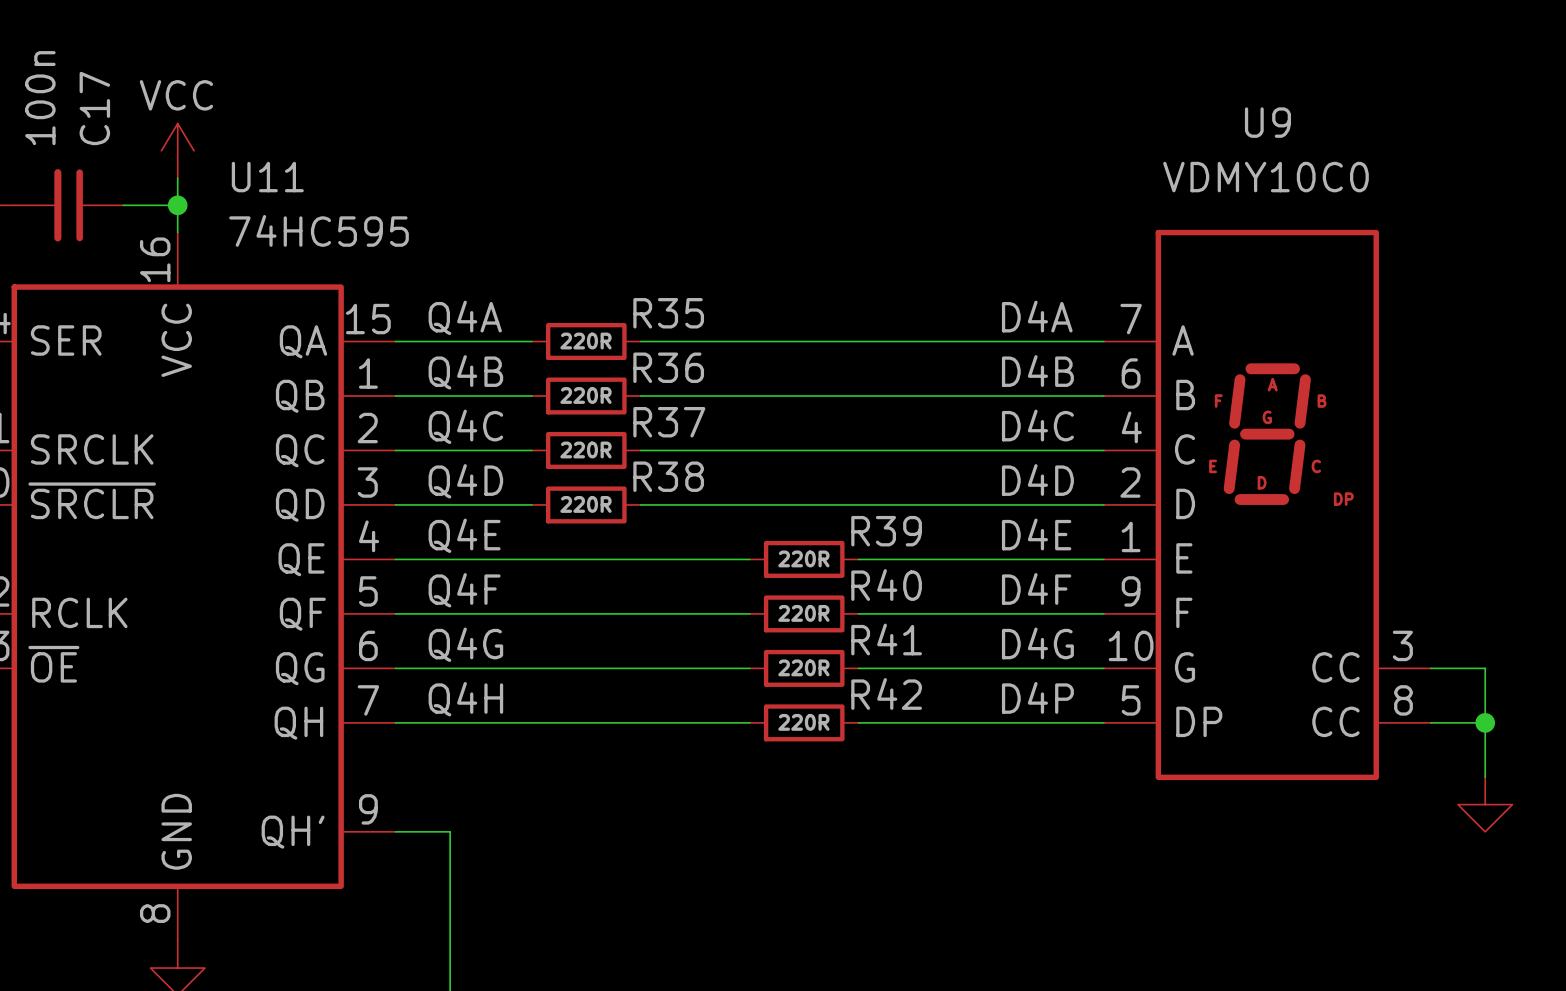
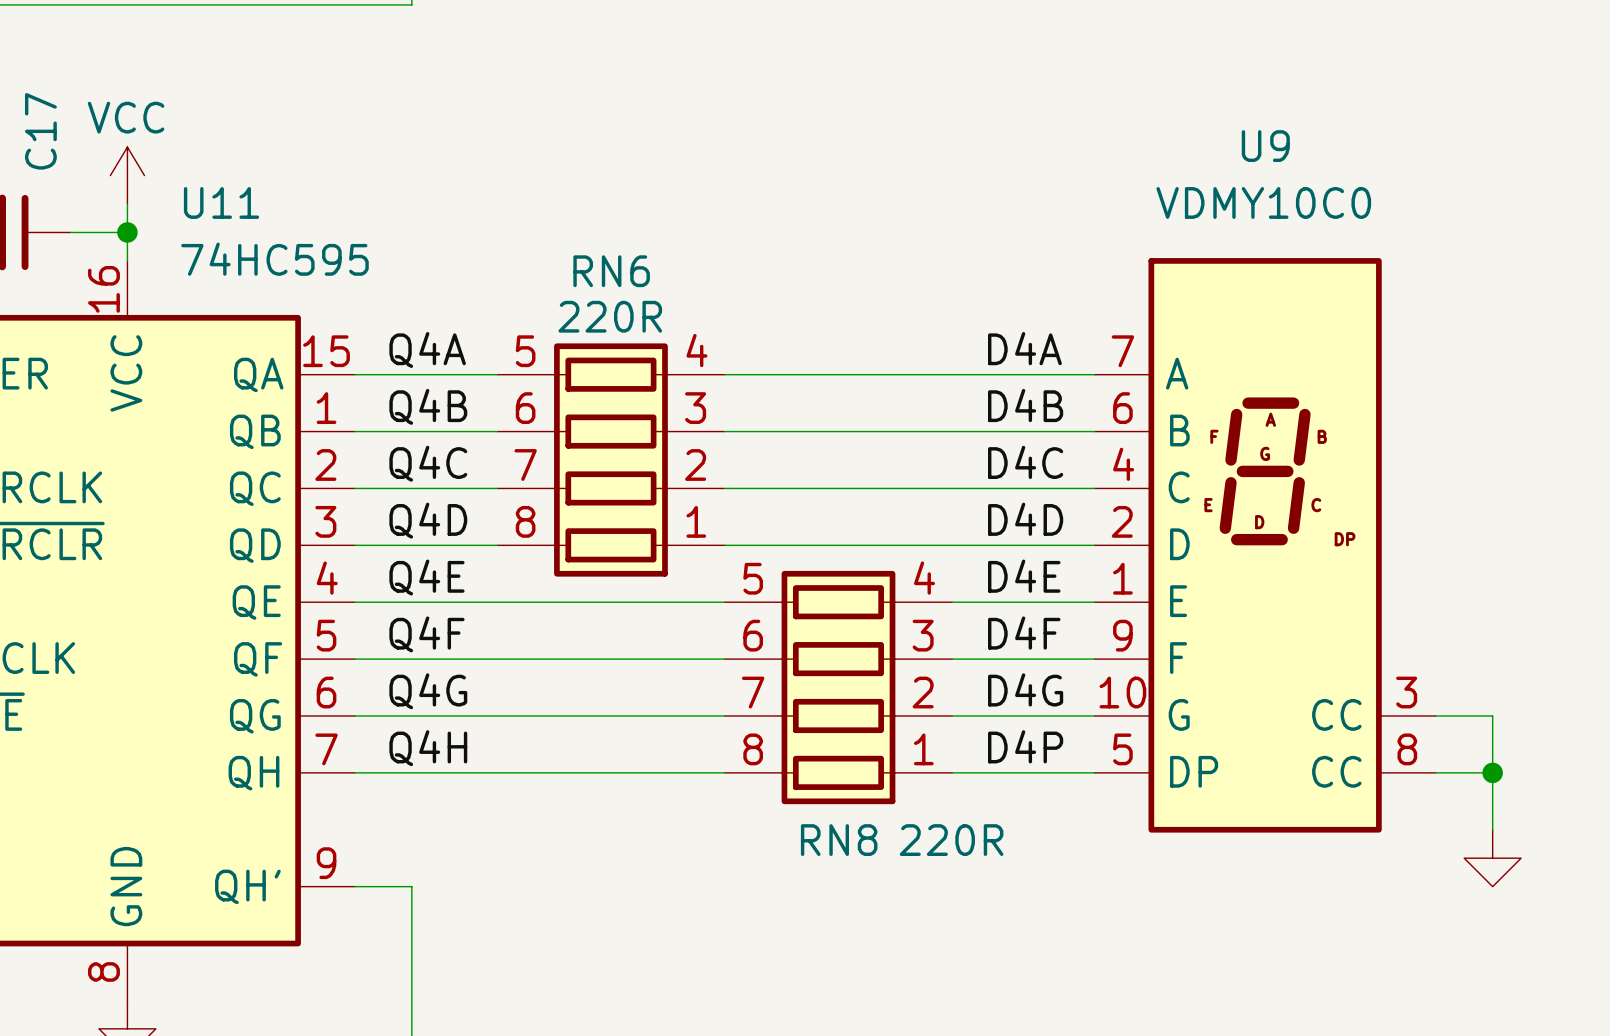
R35: 220R (586, 341) -> none
R36: 220R (586, 396) -> none
RN6: none -> 220R (610, 460)
R37: 220R (586, 450) -> none
R38: 220R (586, 504) -> none
R39: 220R (804, 559) -> none
R40: 220R (804, 613) -> none
RN8: none -> 220R (838, 687)
R41: 220R (804, 668) -> none
R42: 220R (804, 722) -> none

